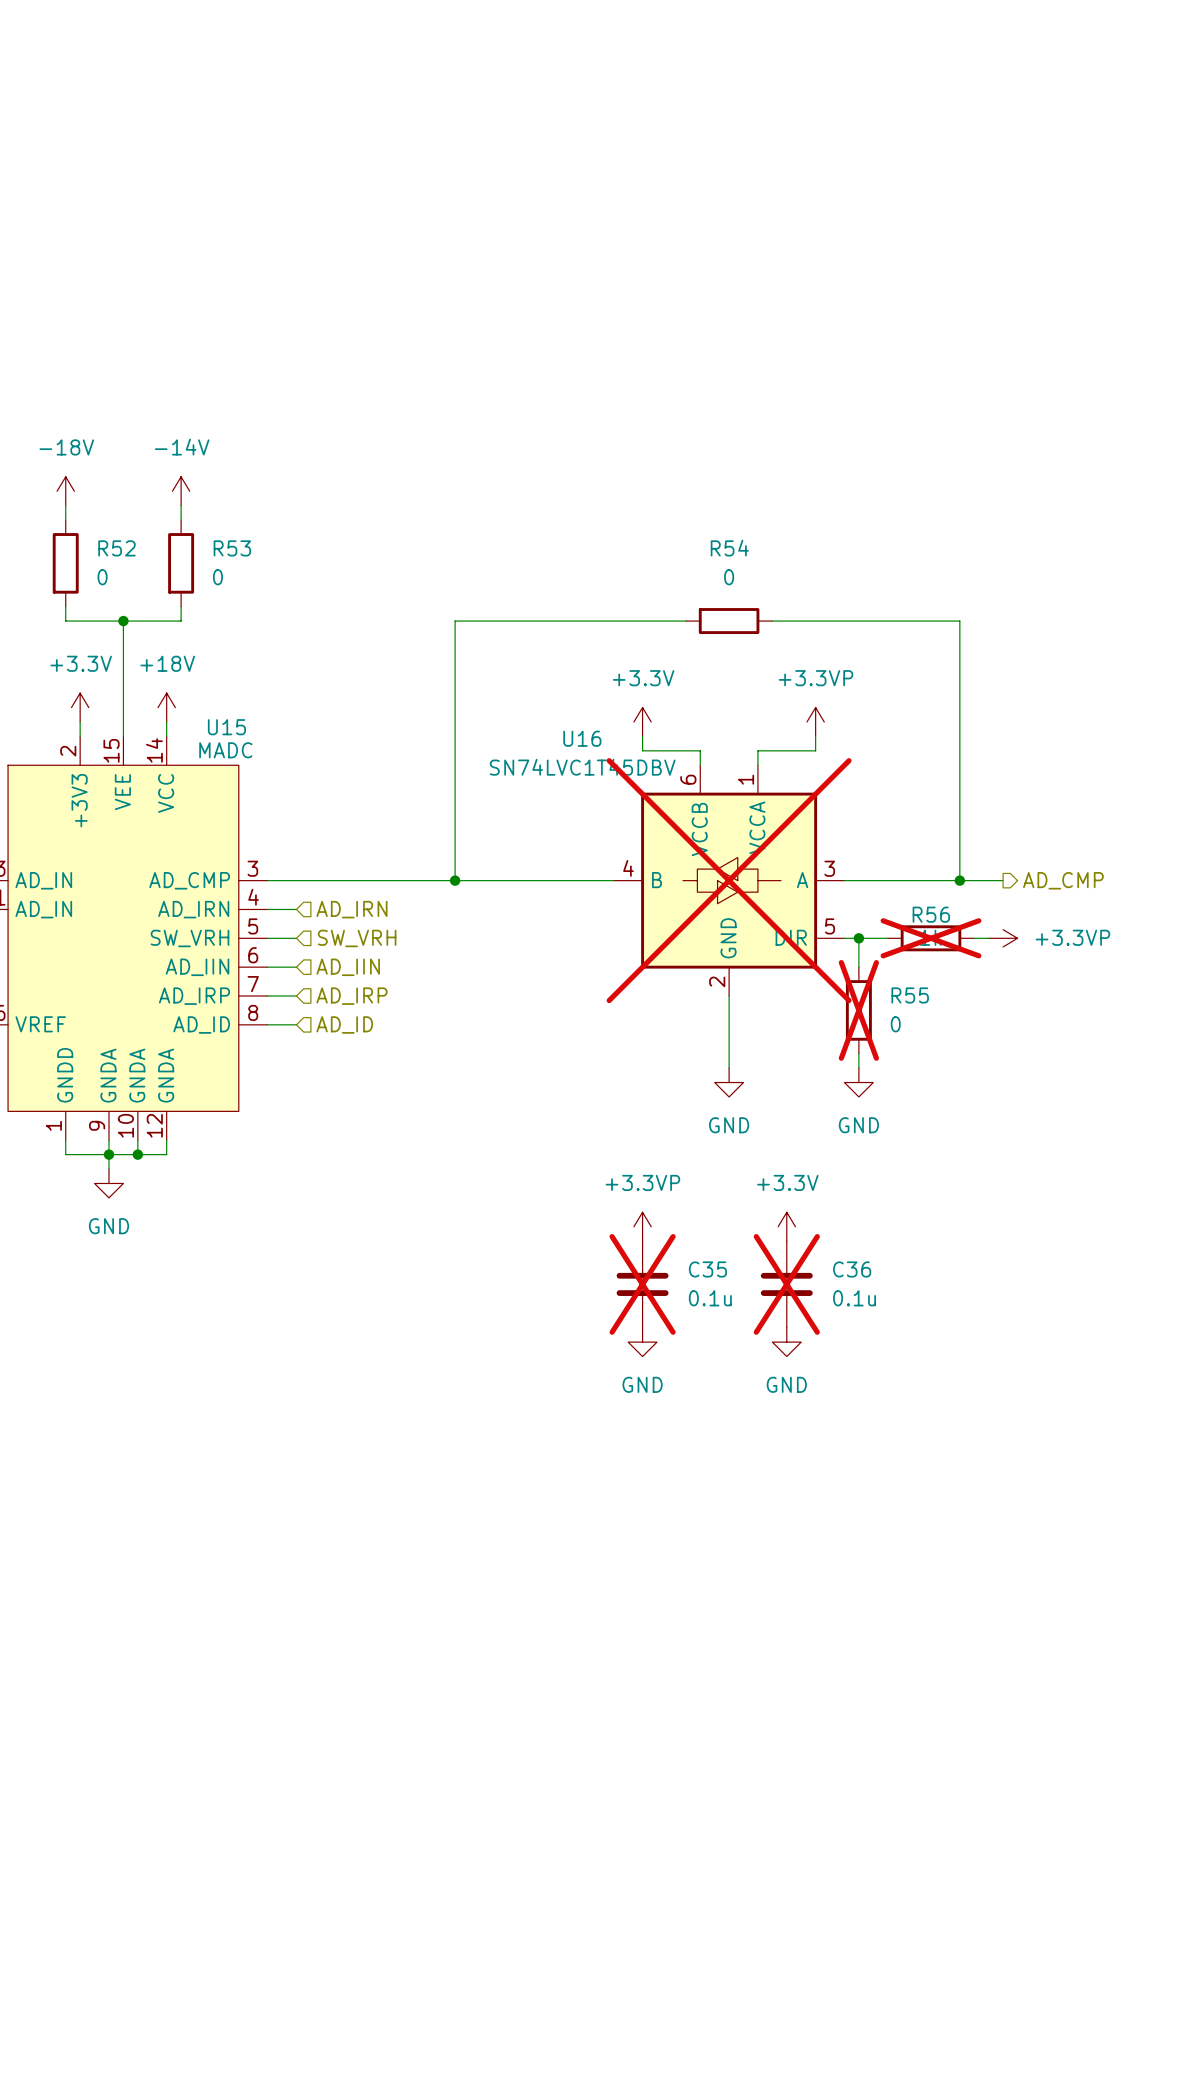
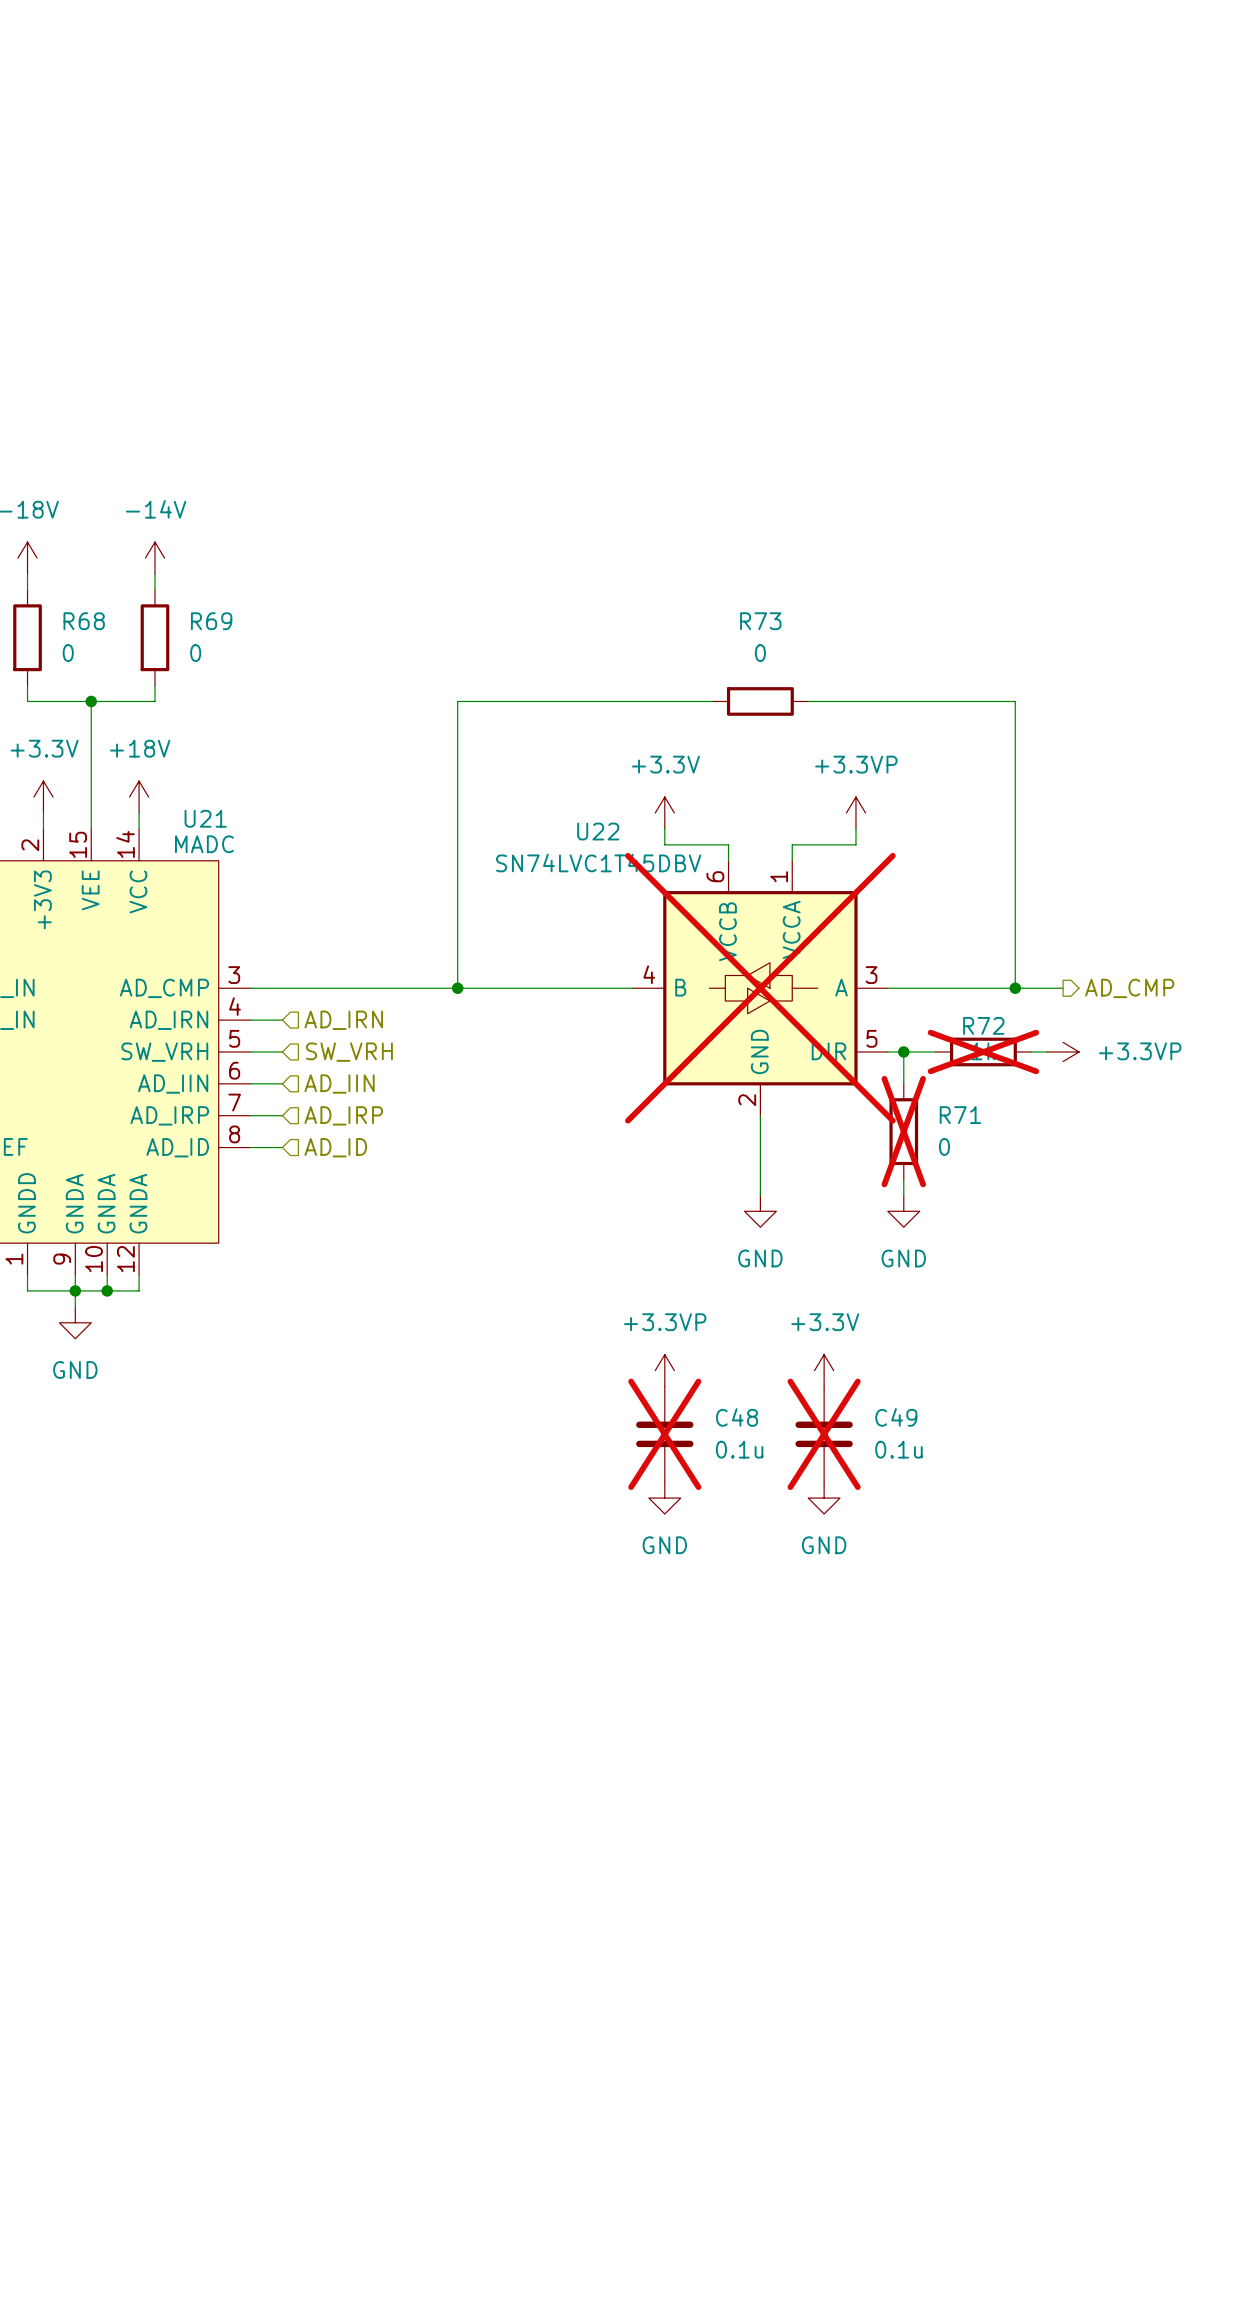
R52 name: R52 (117, 548) -> R68 (84, 621)
R53 name: R53 (232, 548) -> R69 (211, 621)
R54 name: R54 (729, 548) -> R73 (760, 621)
U15 name: U15 (226, 727) -> U21 (205, 818)
U16 name: U16 (582, 738) -> U22 (598, 831)
R56 name: R56 (931, 914) -> R72 (983, 1025)
R55 name: R55 (910, 995) -> R71 (960, 1115)
C35 name: C35 (707, 1269) -> C48 (736, 1417)
C36 name: C36 (852, 1269) -> C49 (896, 1417)

